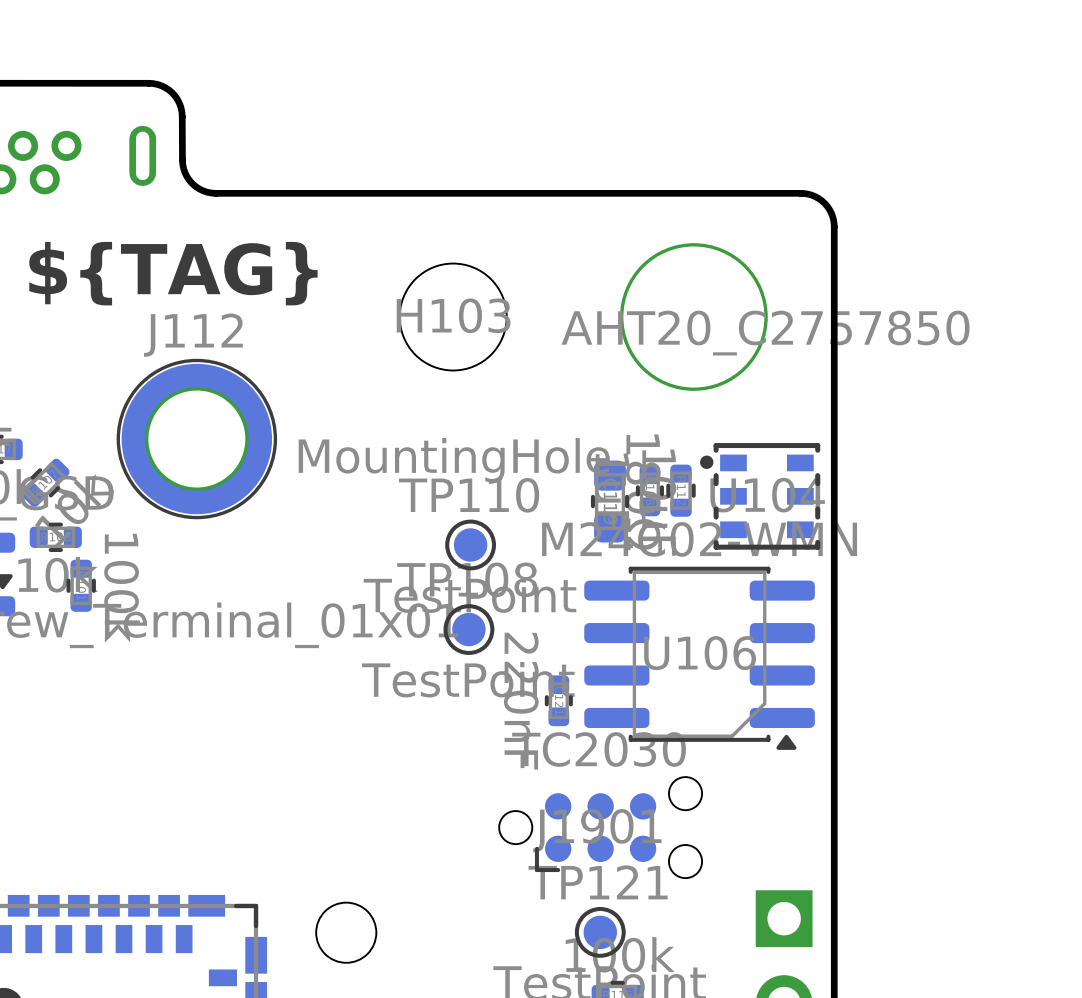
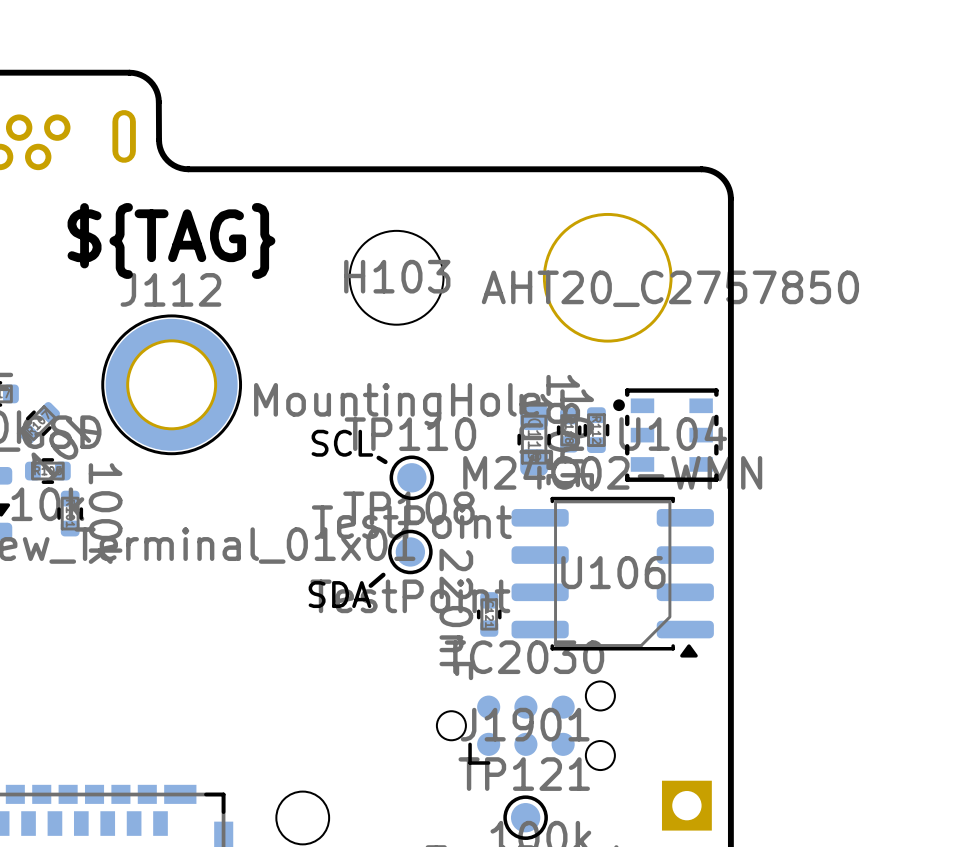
text: none -> SCL (342, 443)
line: none -> (378, 457) (385, 461)
line: none -> (383, 574) (370, 585)
text: none -> SDA (340, 594)

